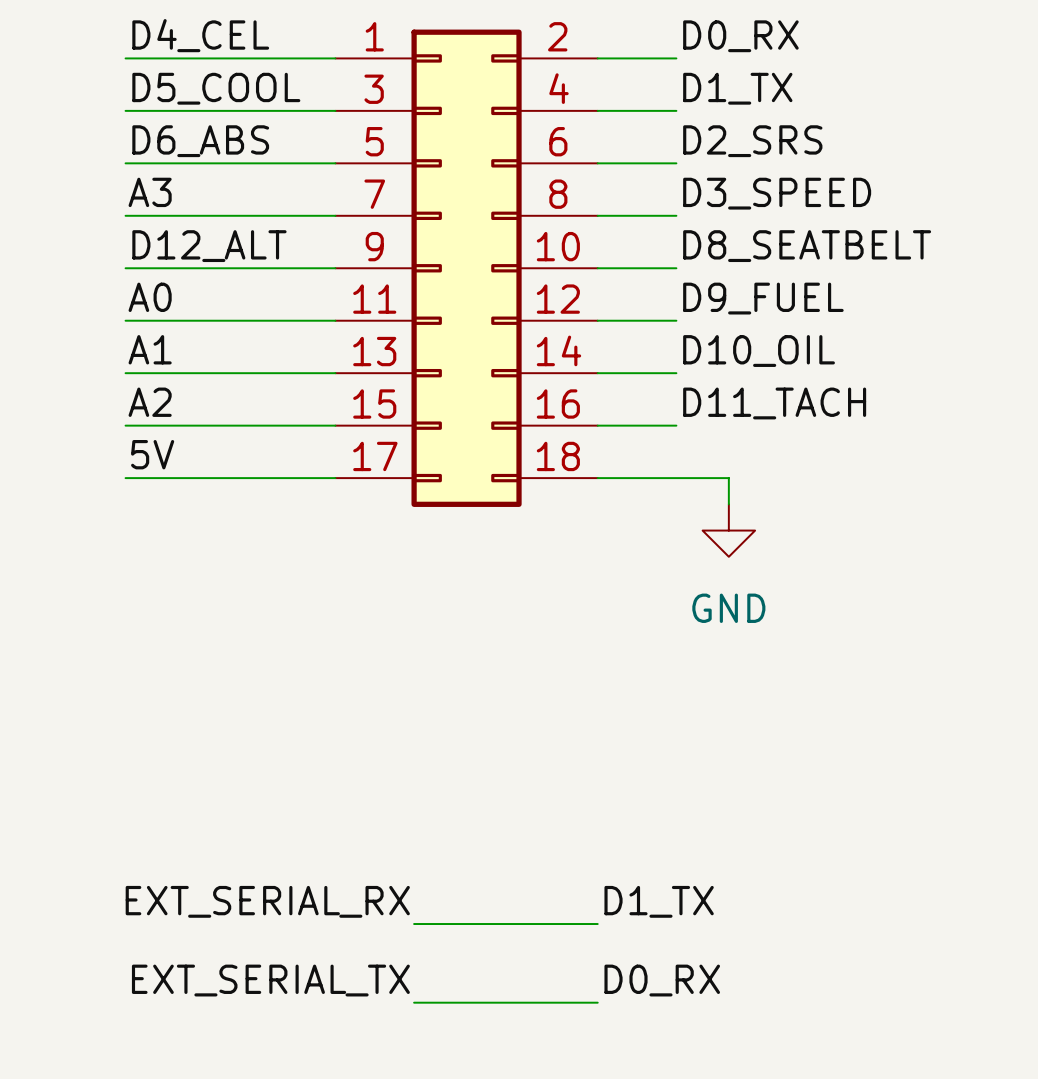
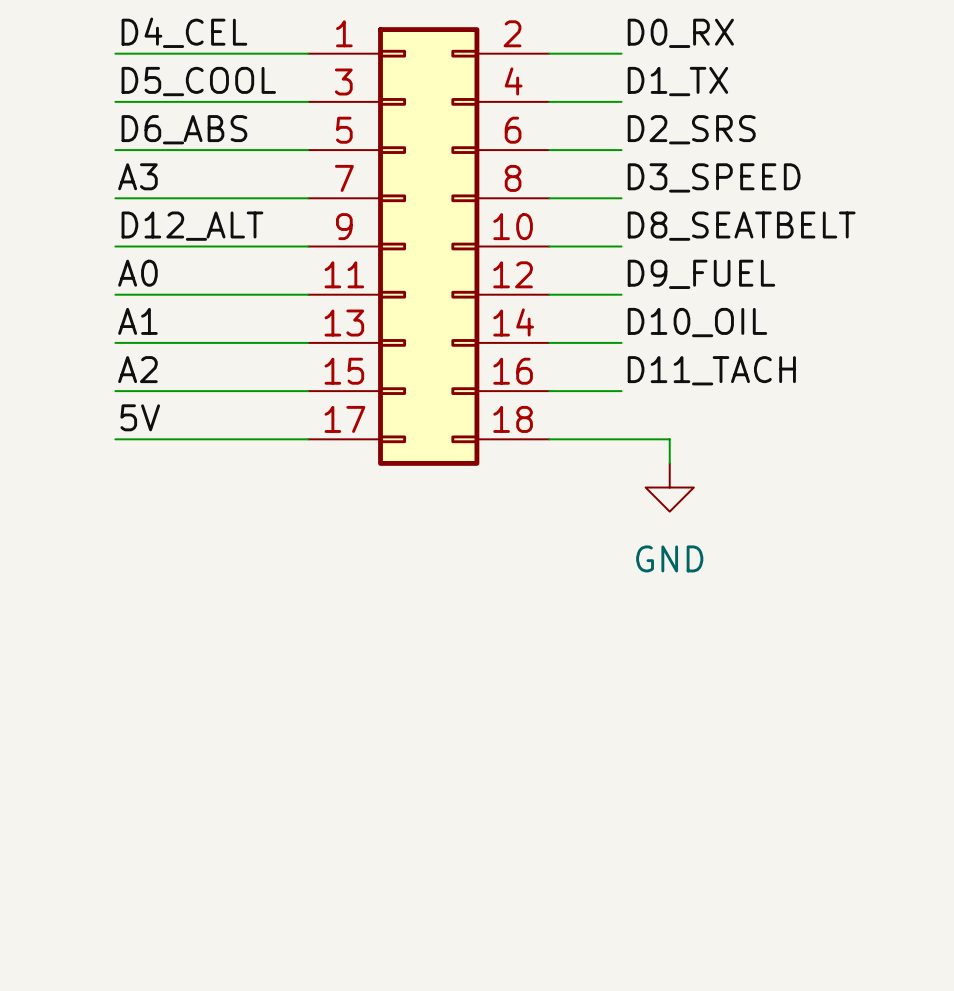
label: EXT_SERIAL_RX (267, 901) -> none
label: D1_TX (659, 901) -> none
wire: (414, 924) (597, 924) -> none
label: EXT_SERIAL_TX (270, 980) -> none
label: D0_RX (662, 980) -> none
wire: (414, 1002) (597, 1002) -> none

